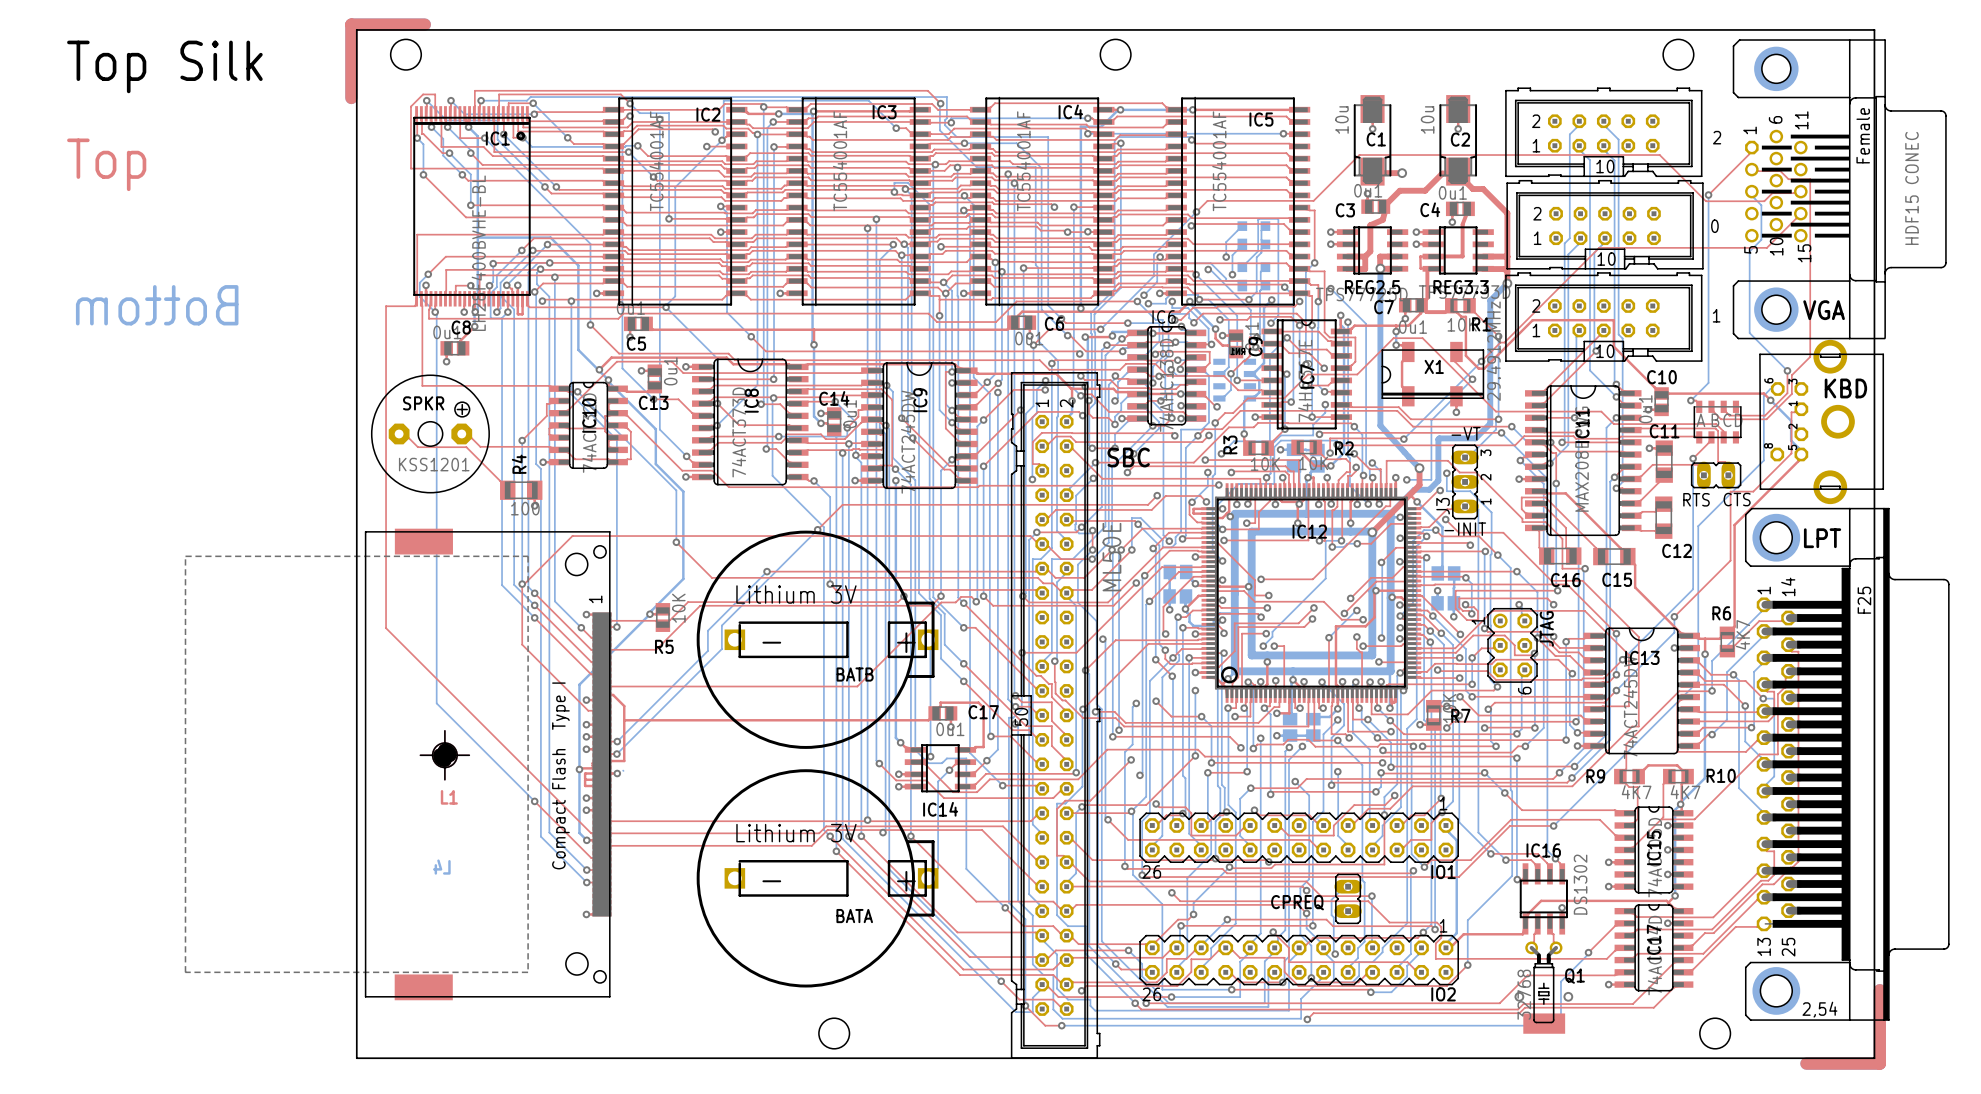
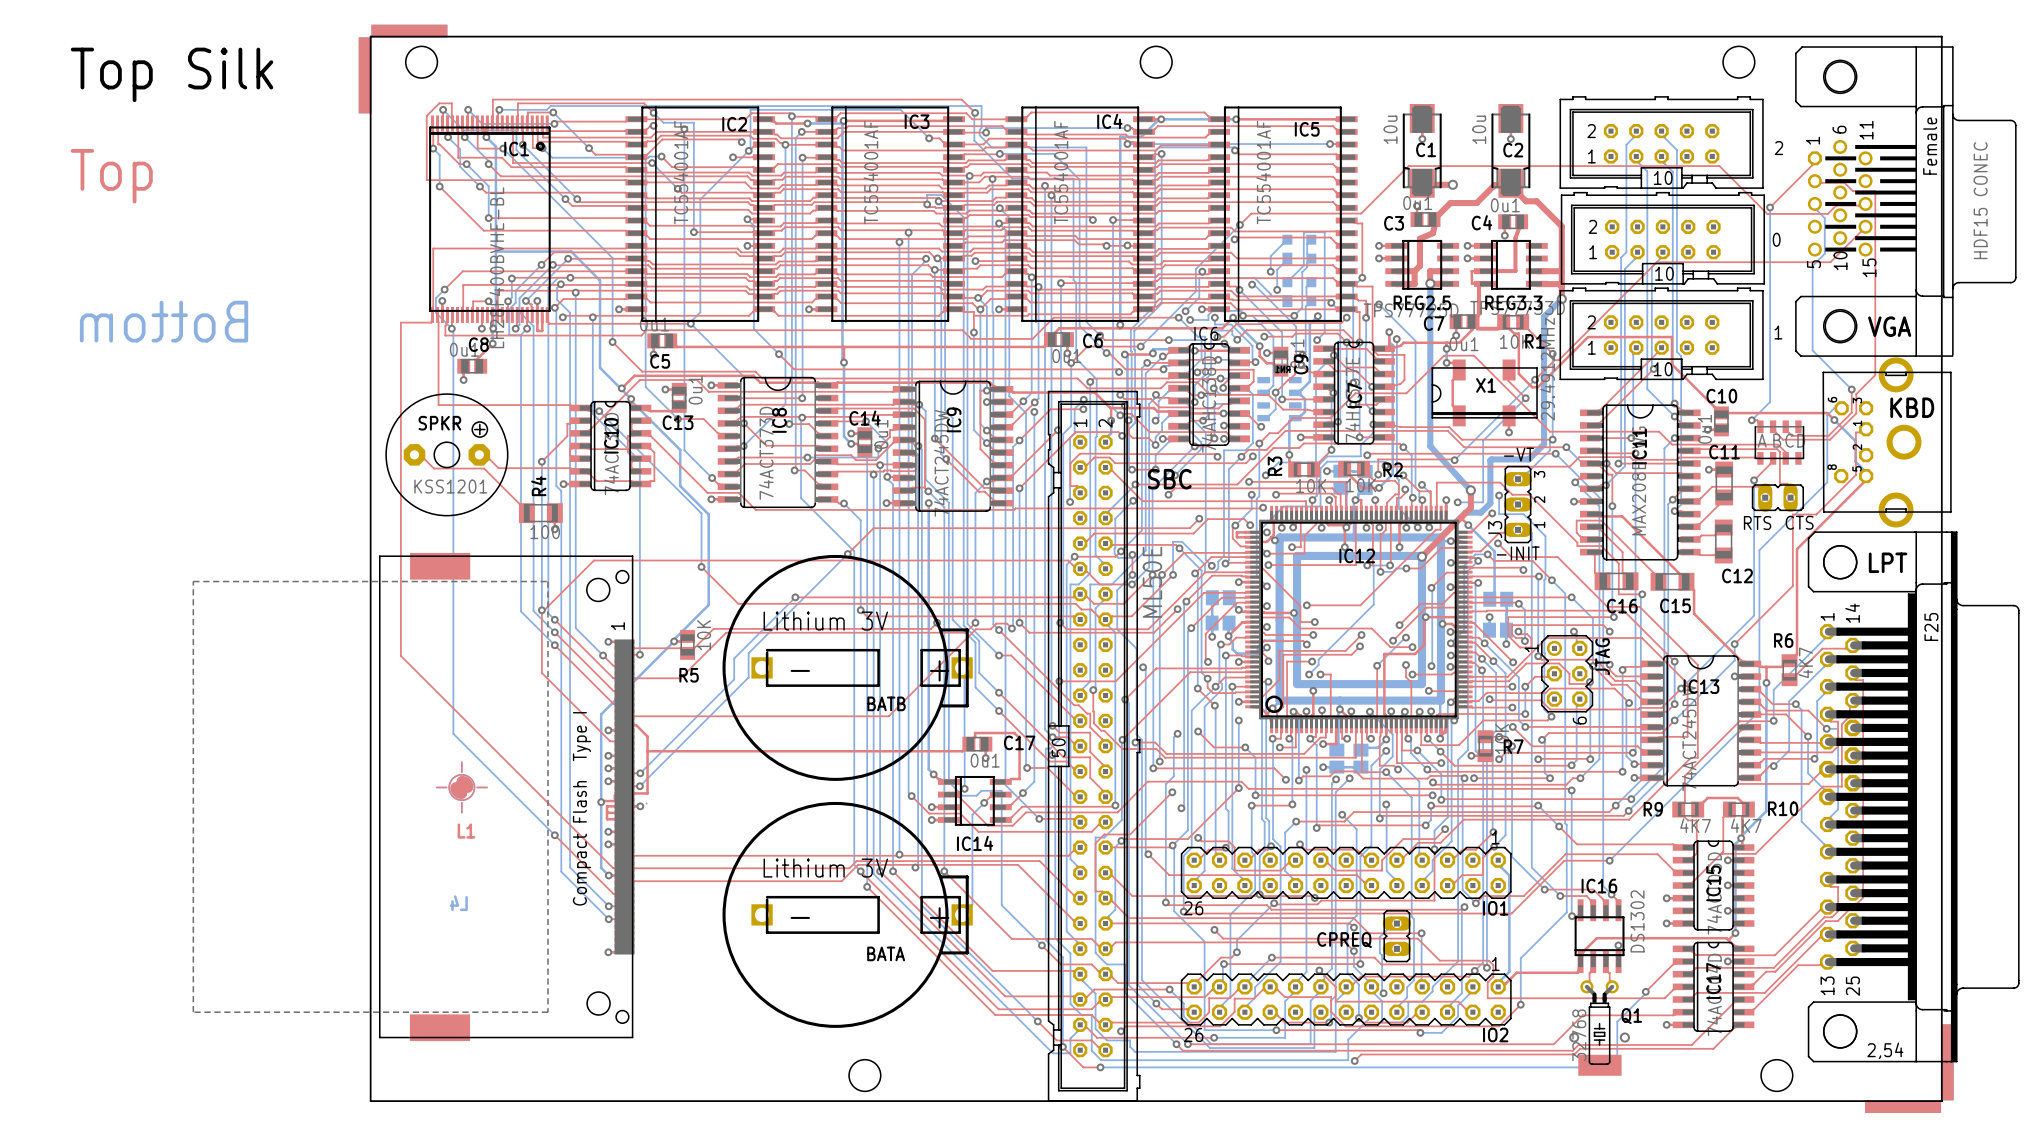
drawing shape: [345, 18, 431, 105] -> [358, 24, 448, 114]
VGA footprint: [1732, 39, 1947, 340] -> [1795, 46, 2017, 357]
IC7 footprint: [1261, 319, 1353, 430] -> [1313, 341, 1395, 445]
IC8 footprint: [692, 358, 809, 486] -> [717, 376, 839, 509]
IC9 footprint: [861, 362, 978, 490] -> [892, 380, 1014, 512]
LPT footprint: [1745, 507, 1950, 1021] -> [1807, 531, 2020, 1063]
IC13 footprint: [1583, 627, 1700, 755] -> [1640, 655, 1762, 787]
drawing shape: [419, 730, 471, 781] -> [435, 761, 488, 814]
drawing shape: [1800, 984, 1886, 1070] -> [1865, 1024, 1954, 1114]

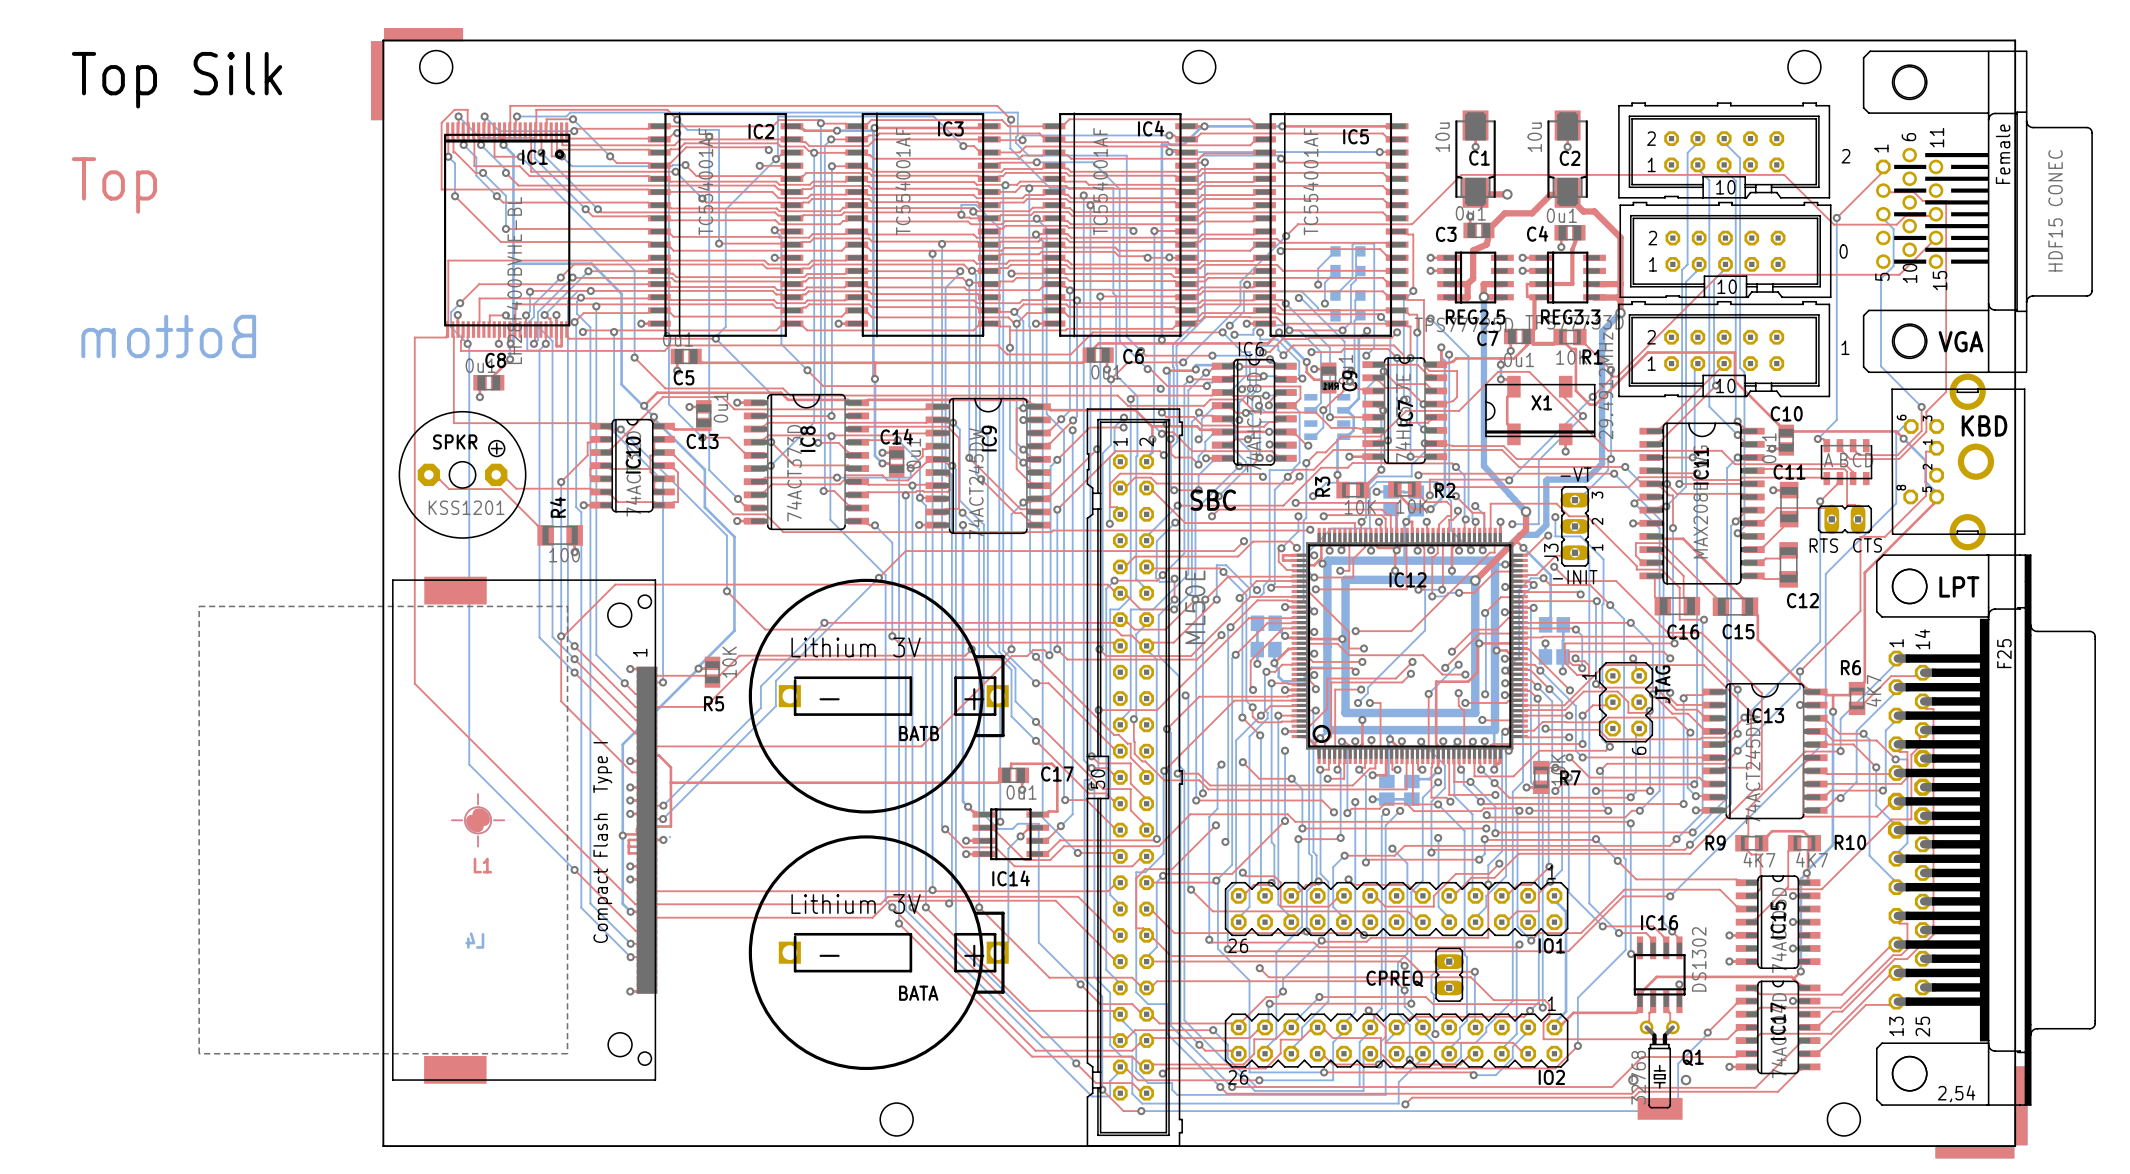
IC7 footprint: [1313, 341, 1395, 445] -> [1362, 357, 1448, 465]

